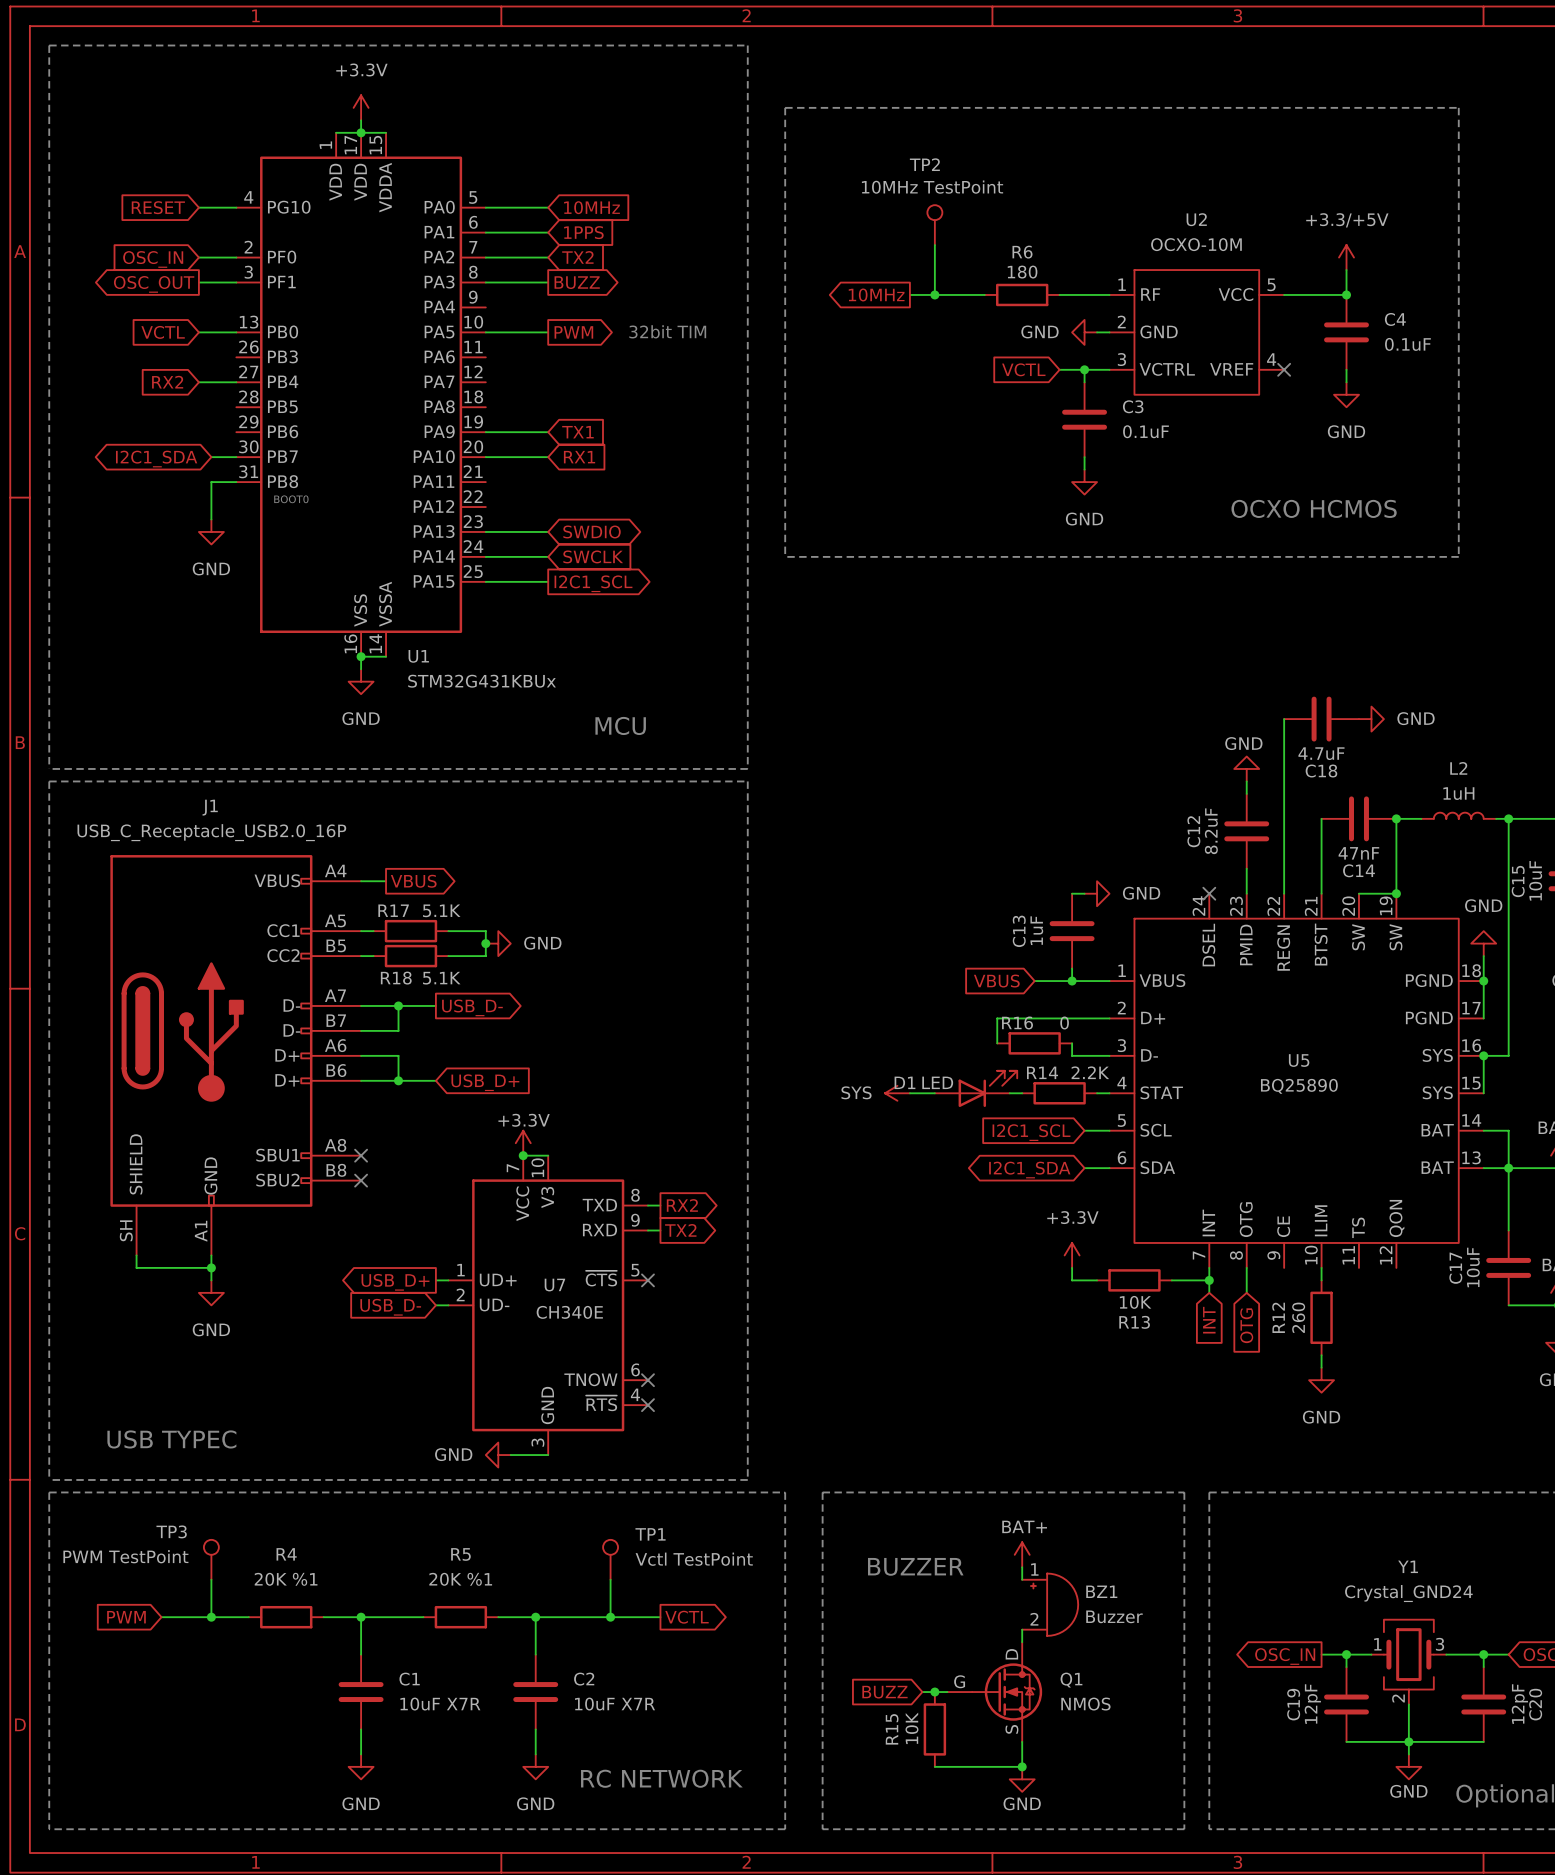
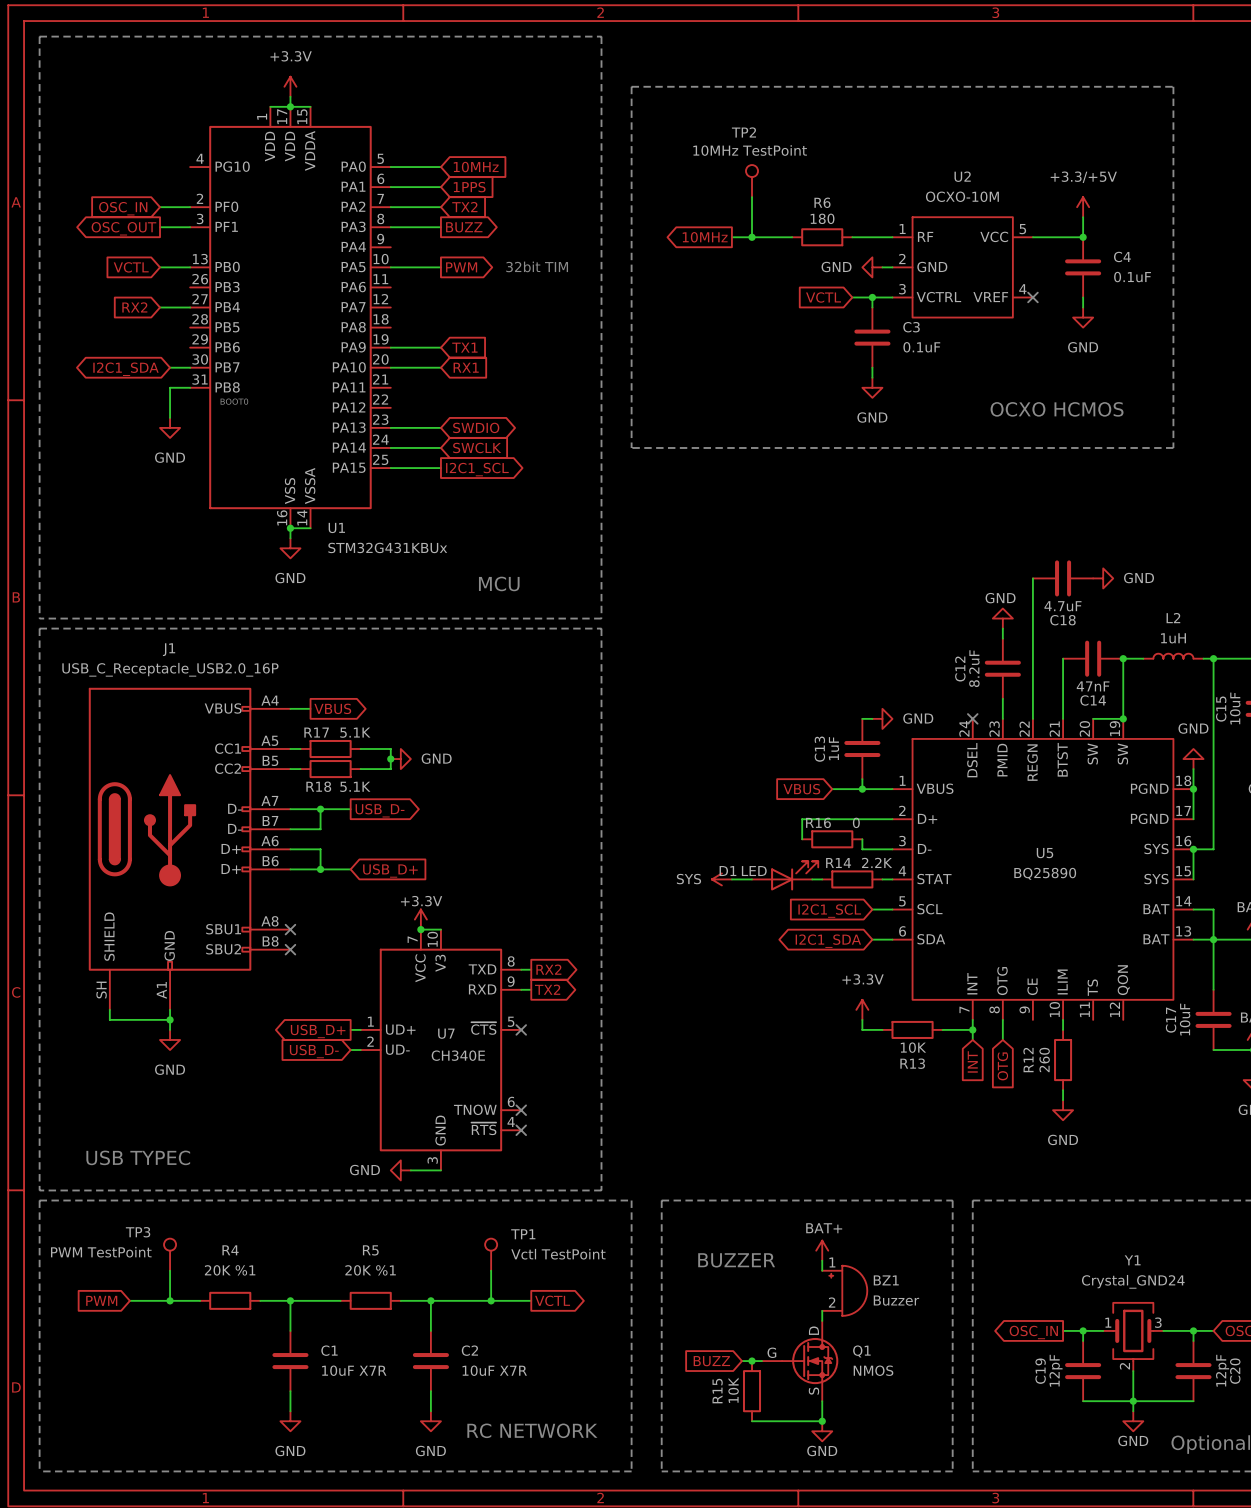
global label: RESET (158, 207) -> none
wire: (198, 207) (236, 207) -> none

